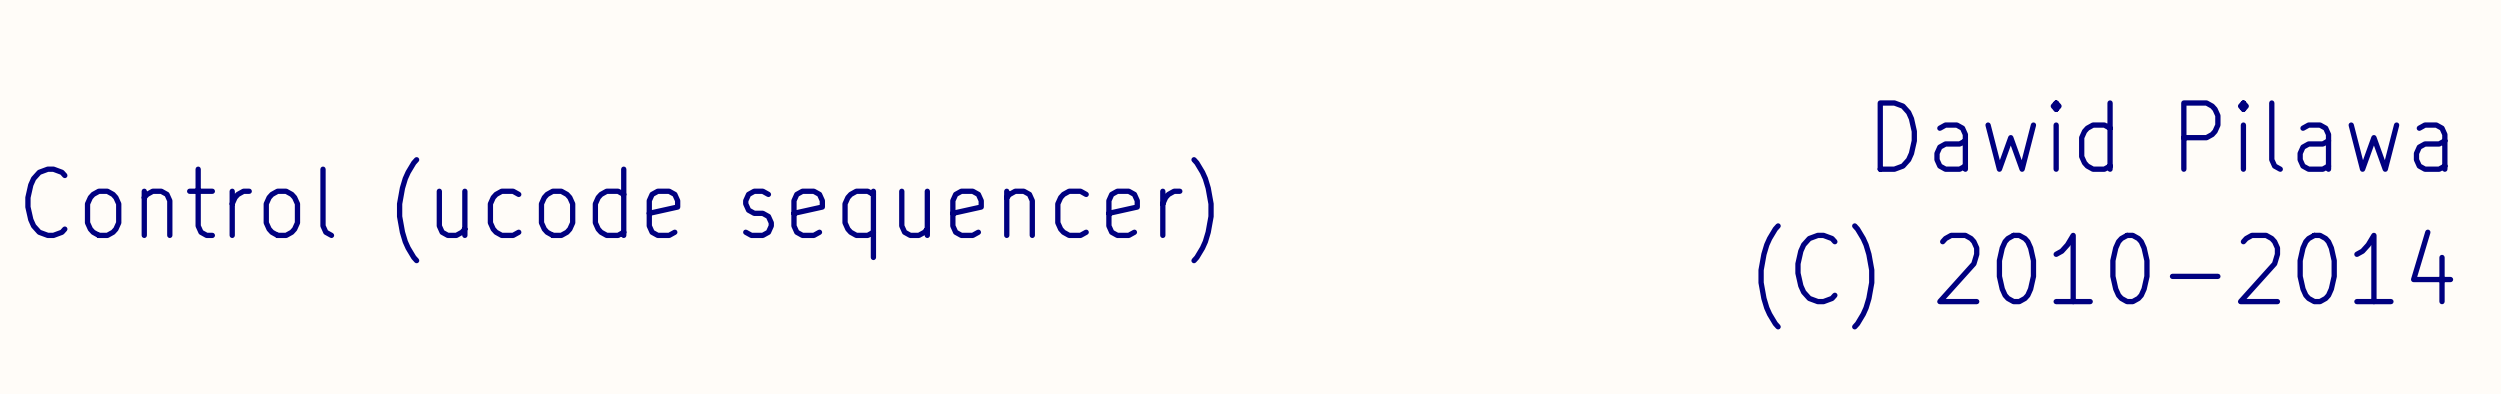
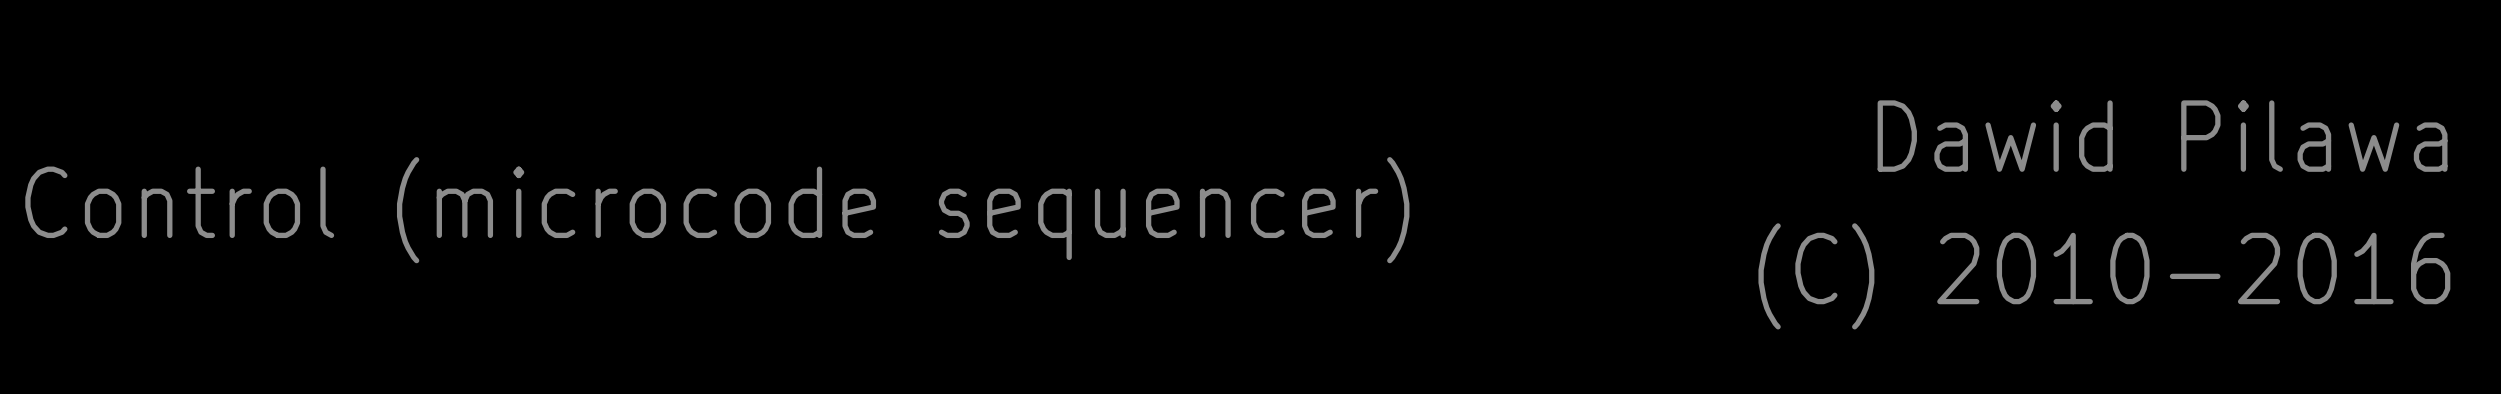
text: Control (ucode sequencer) (619, 210) -> Control (microcode sequencer) (717, 210)
text: (C) 2010-2014 (2105, 276) -> (C) 2010-2016 (2104, 276)

